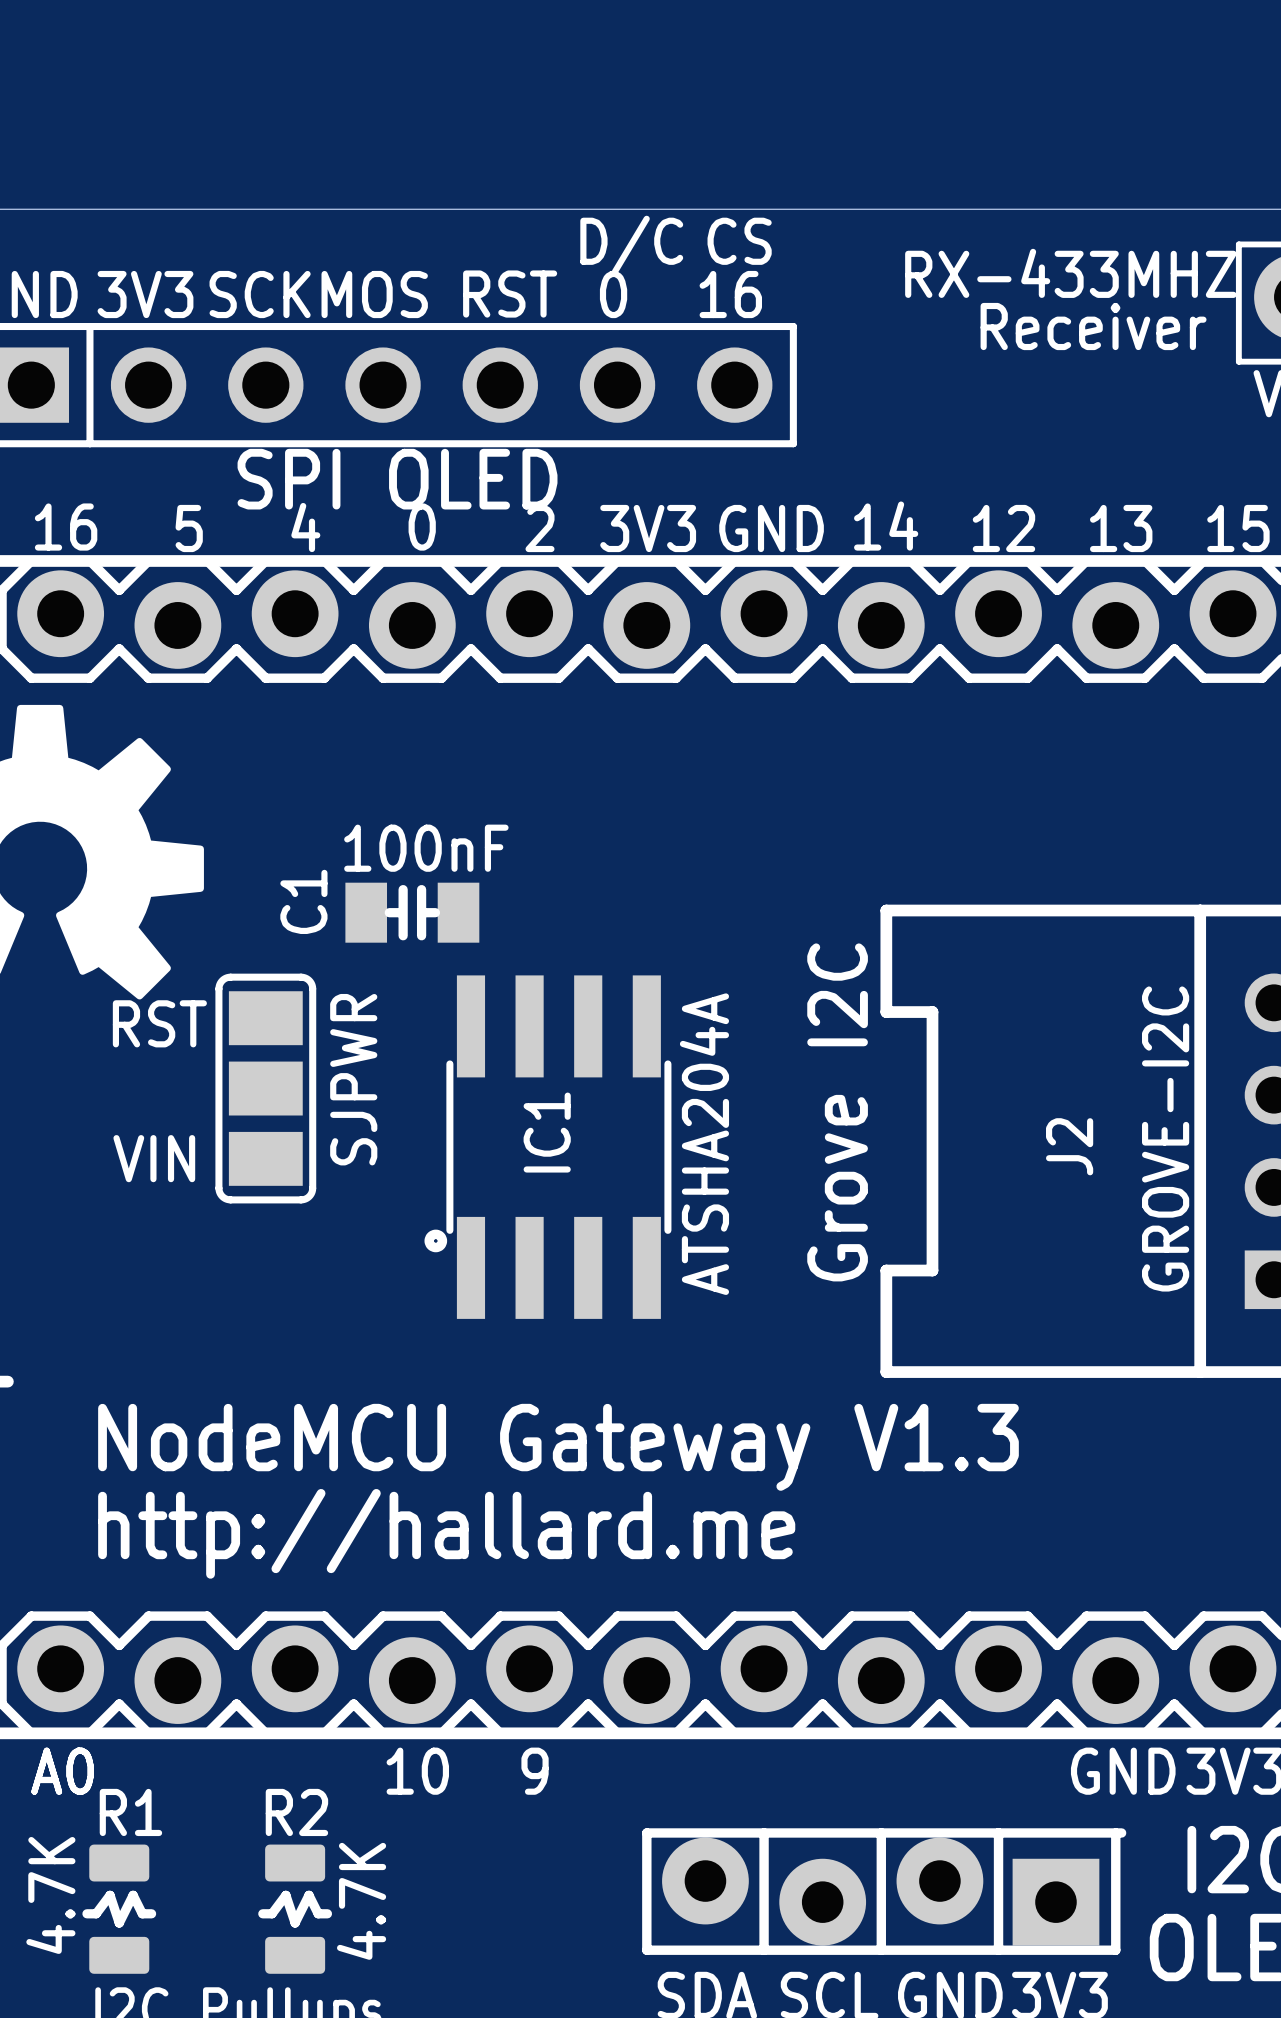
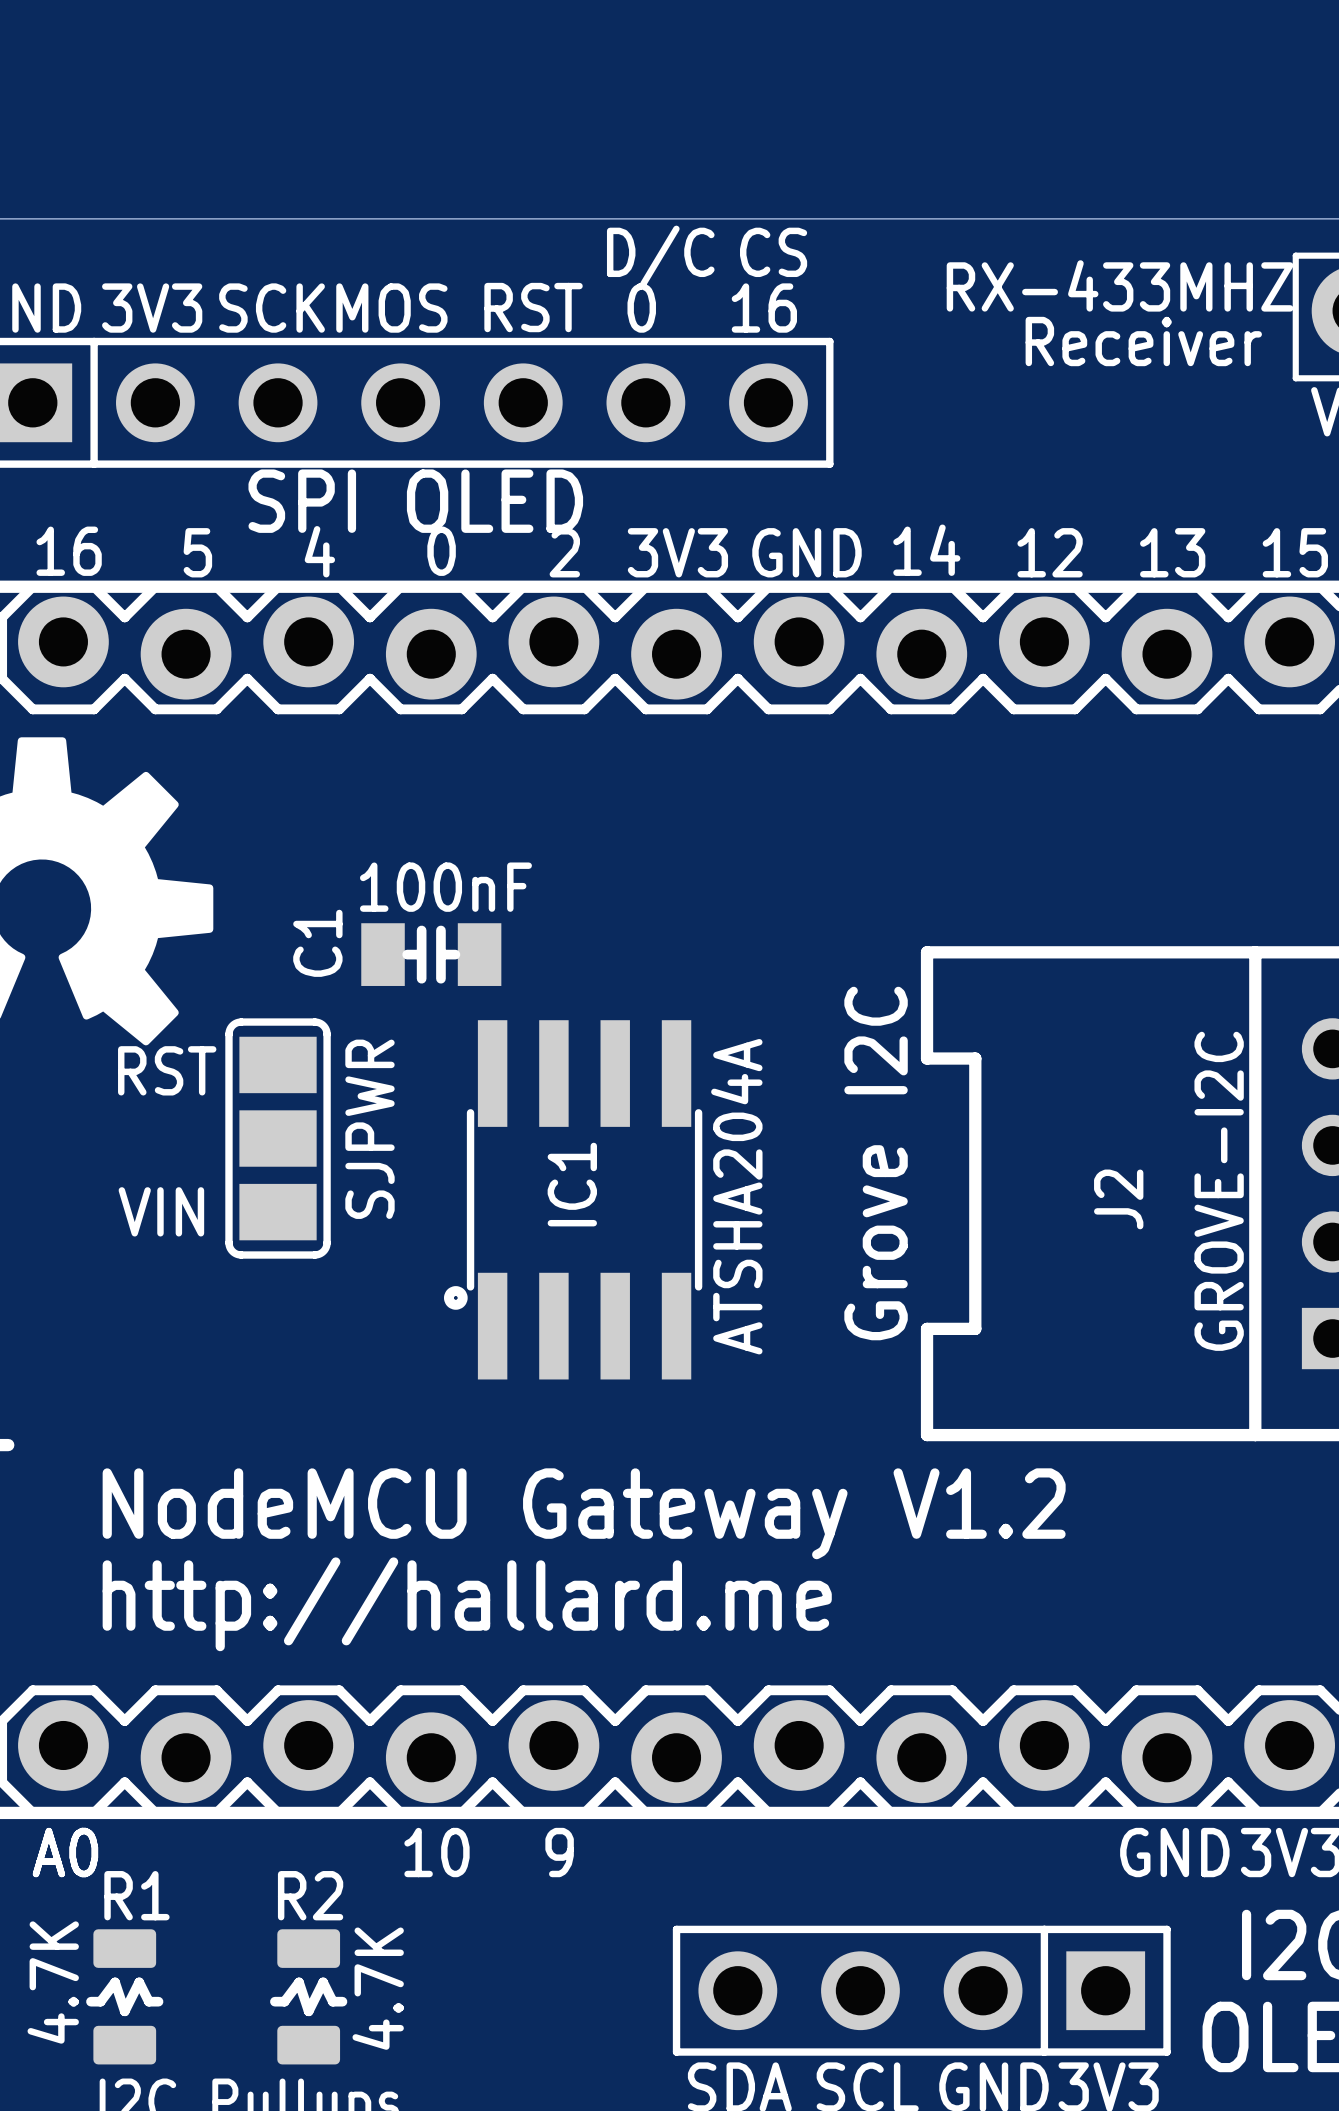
text: NodeMCU Gateway V1.3 (558, 1447) -> NodeMCU Gateway V1.2 (584, 1513)
part footprint: [642, 1828, 1127, 1955] -> [672, 1925, 1171, 2056]

